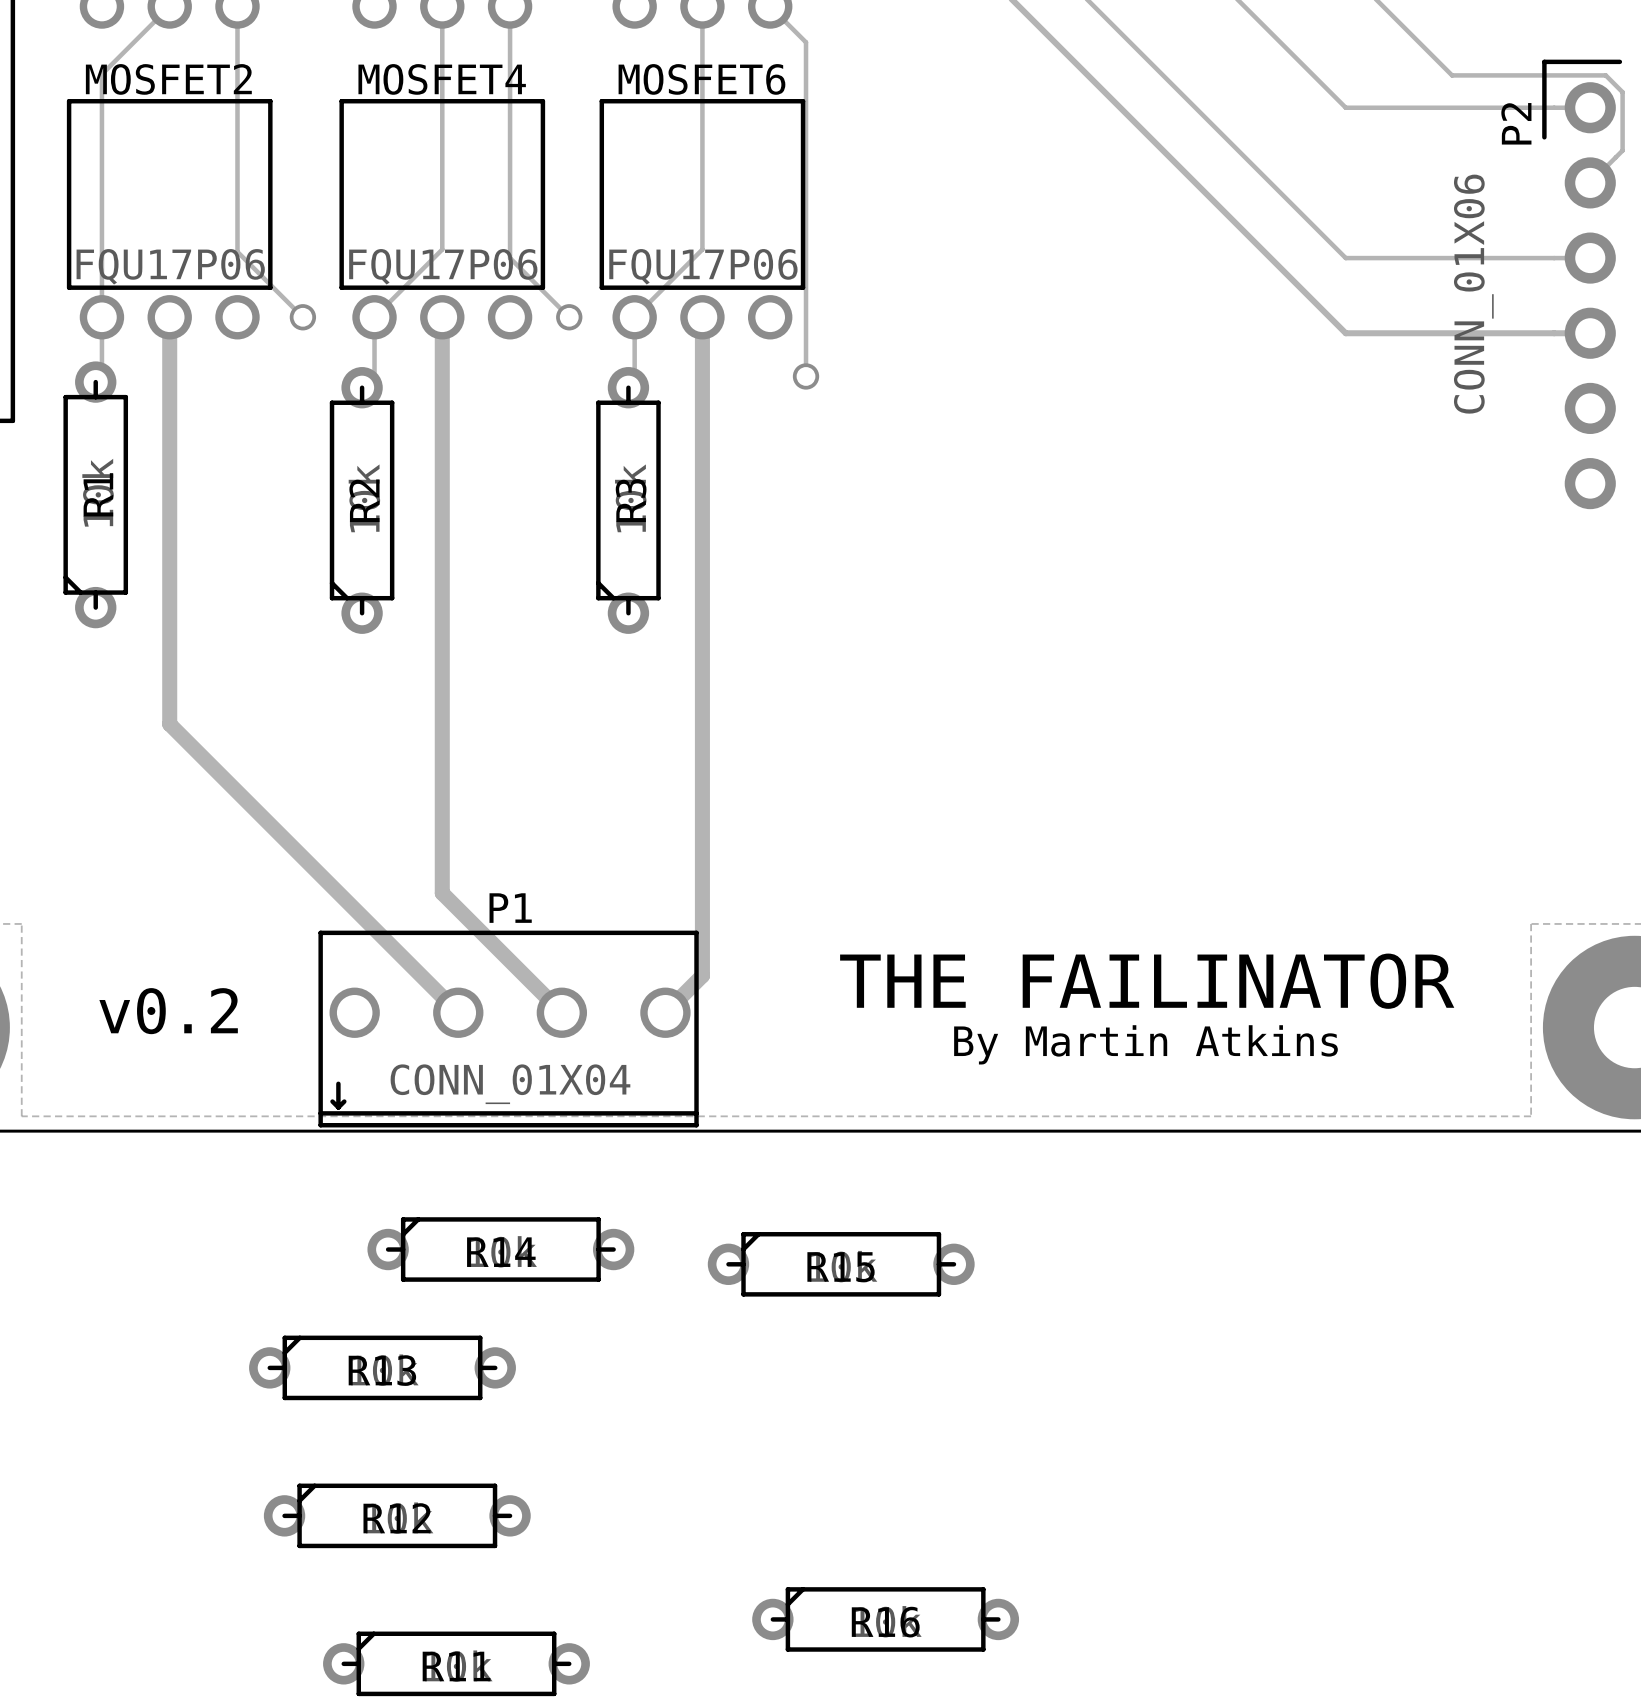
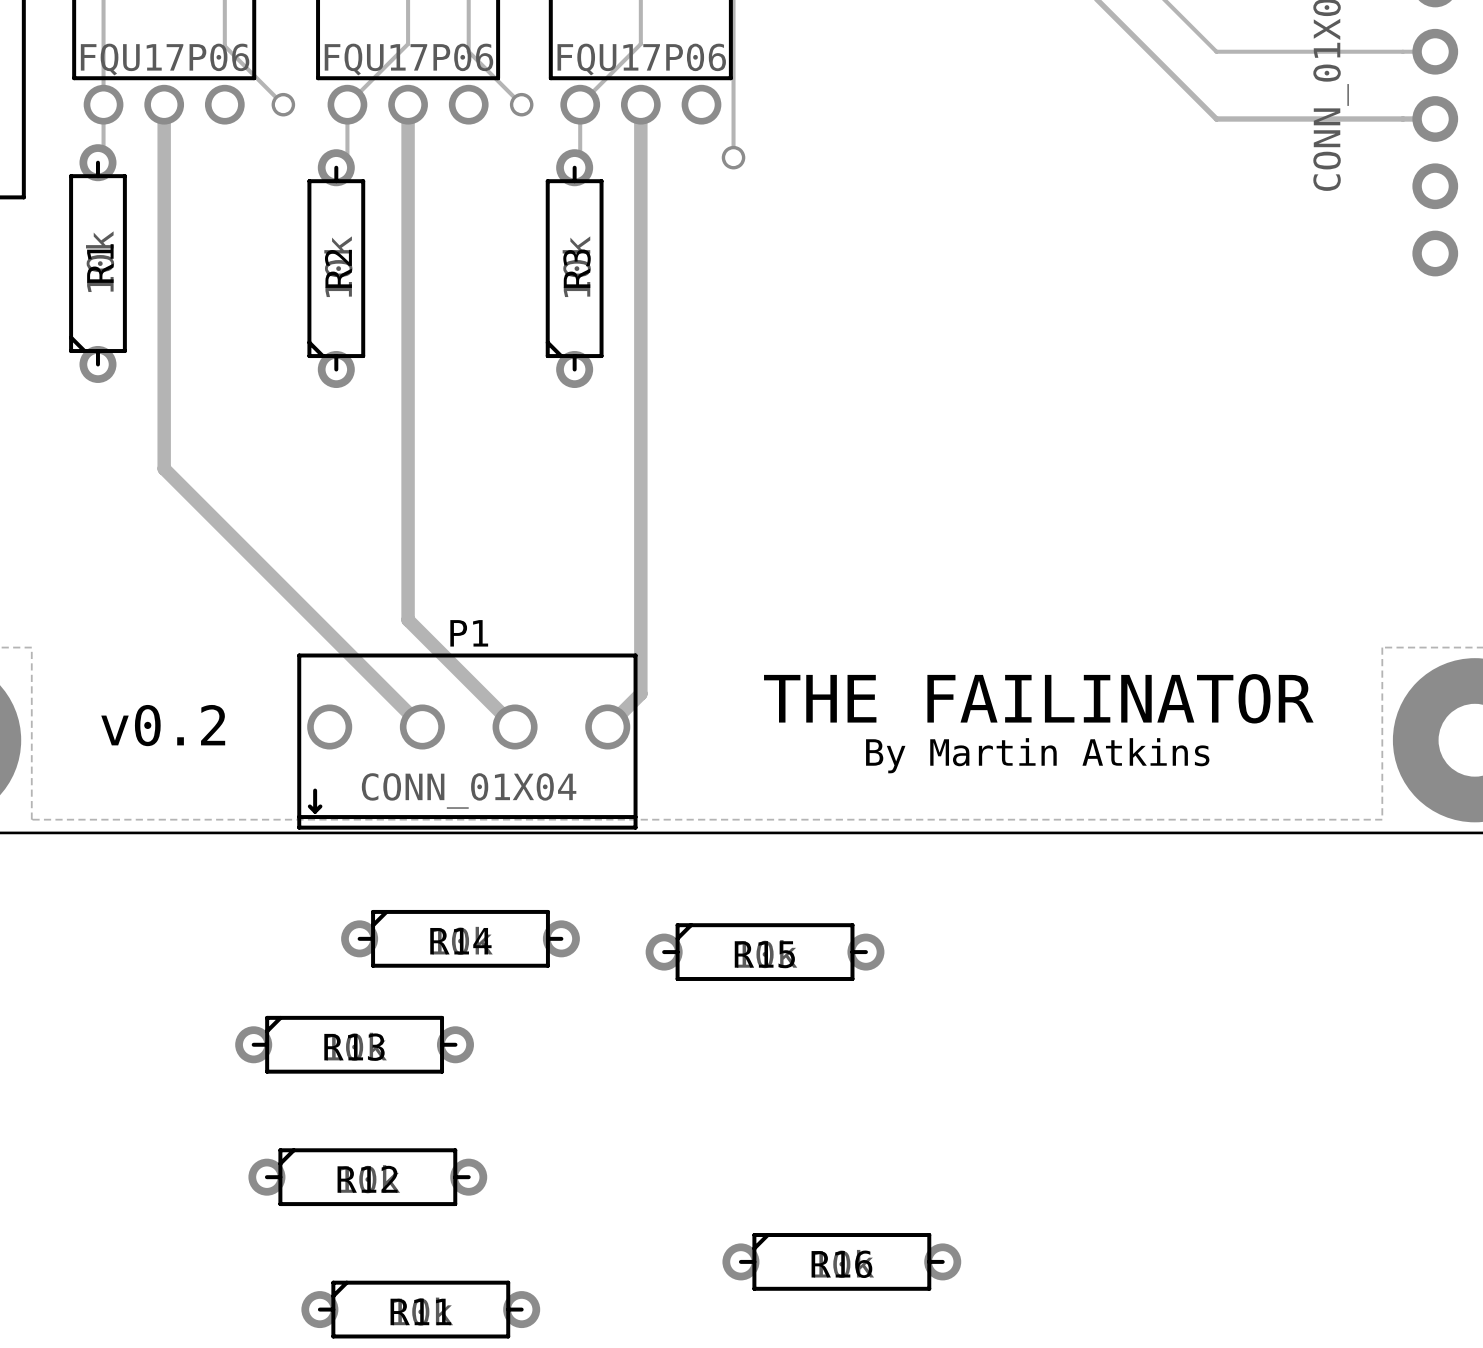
R16 position: (885, 1619) -> (841, 1261)

